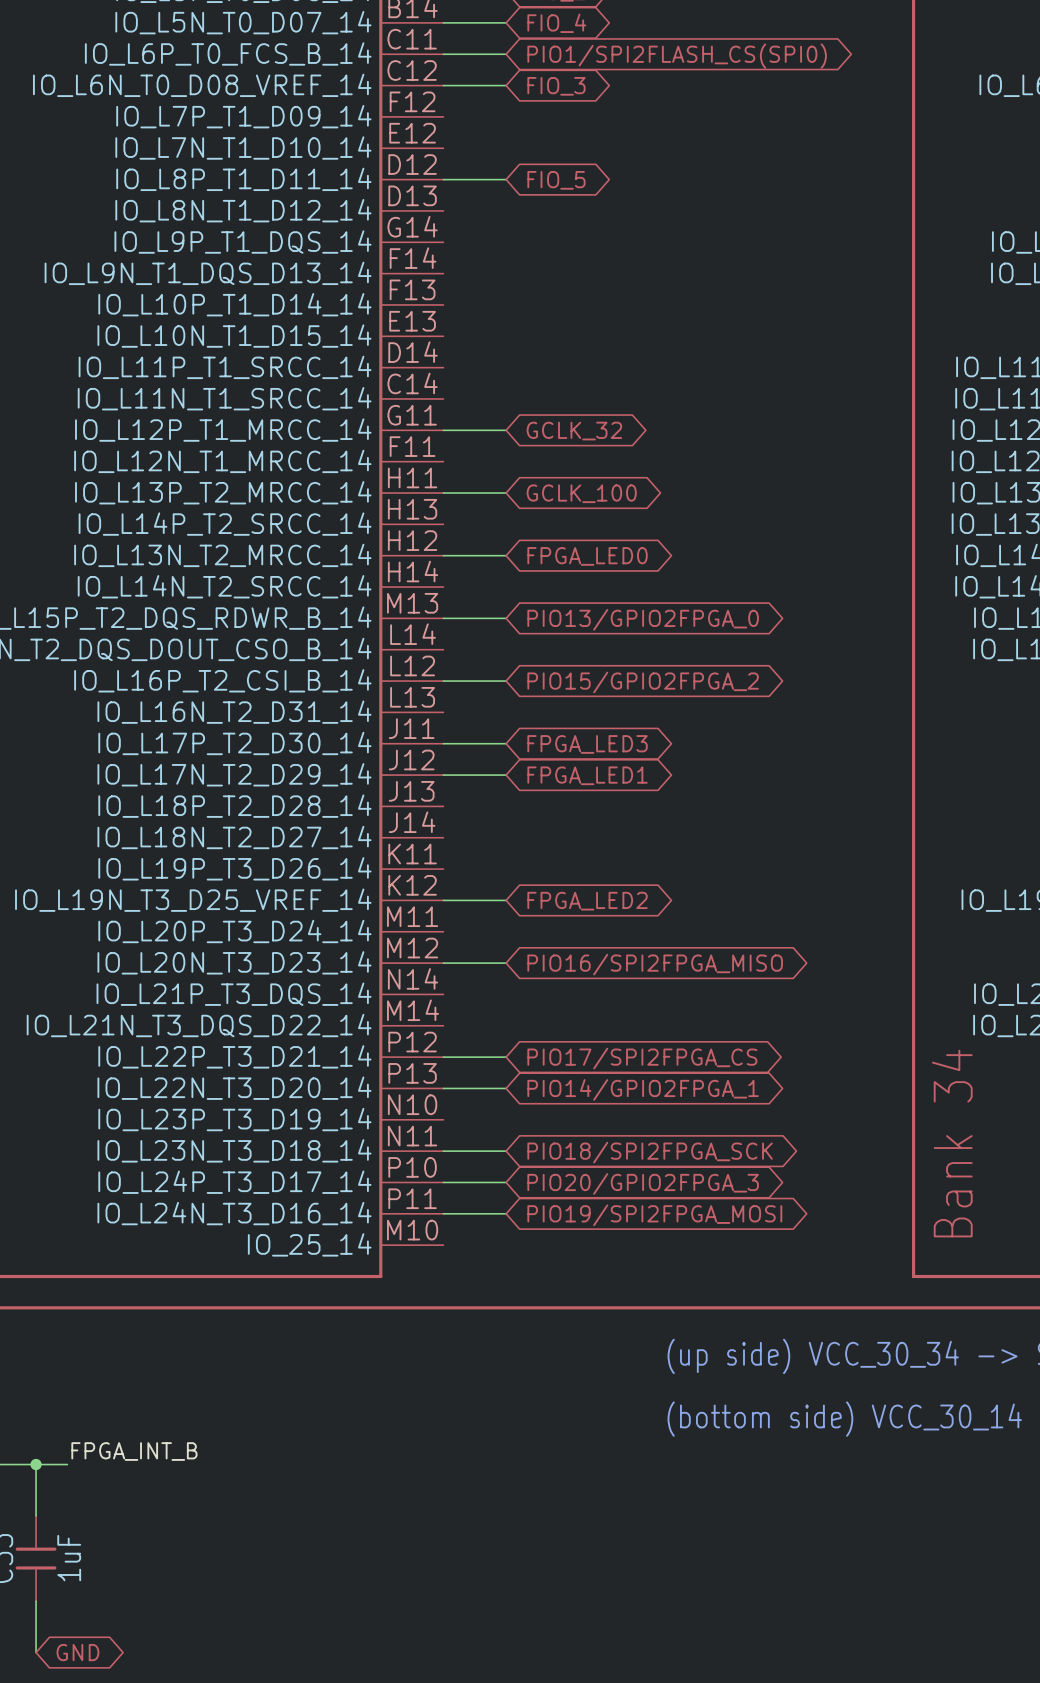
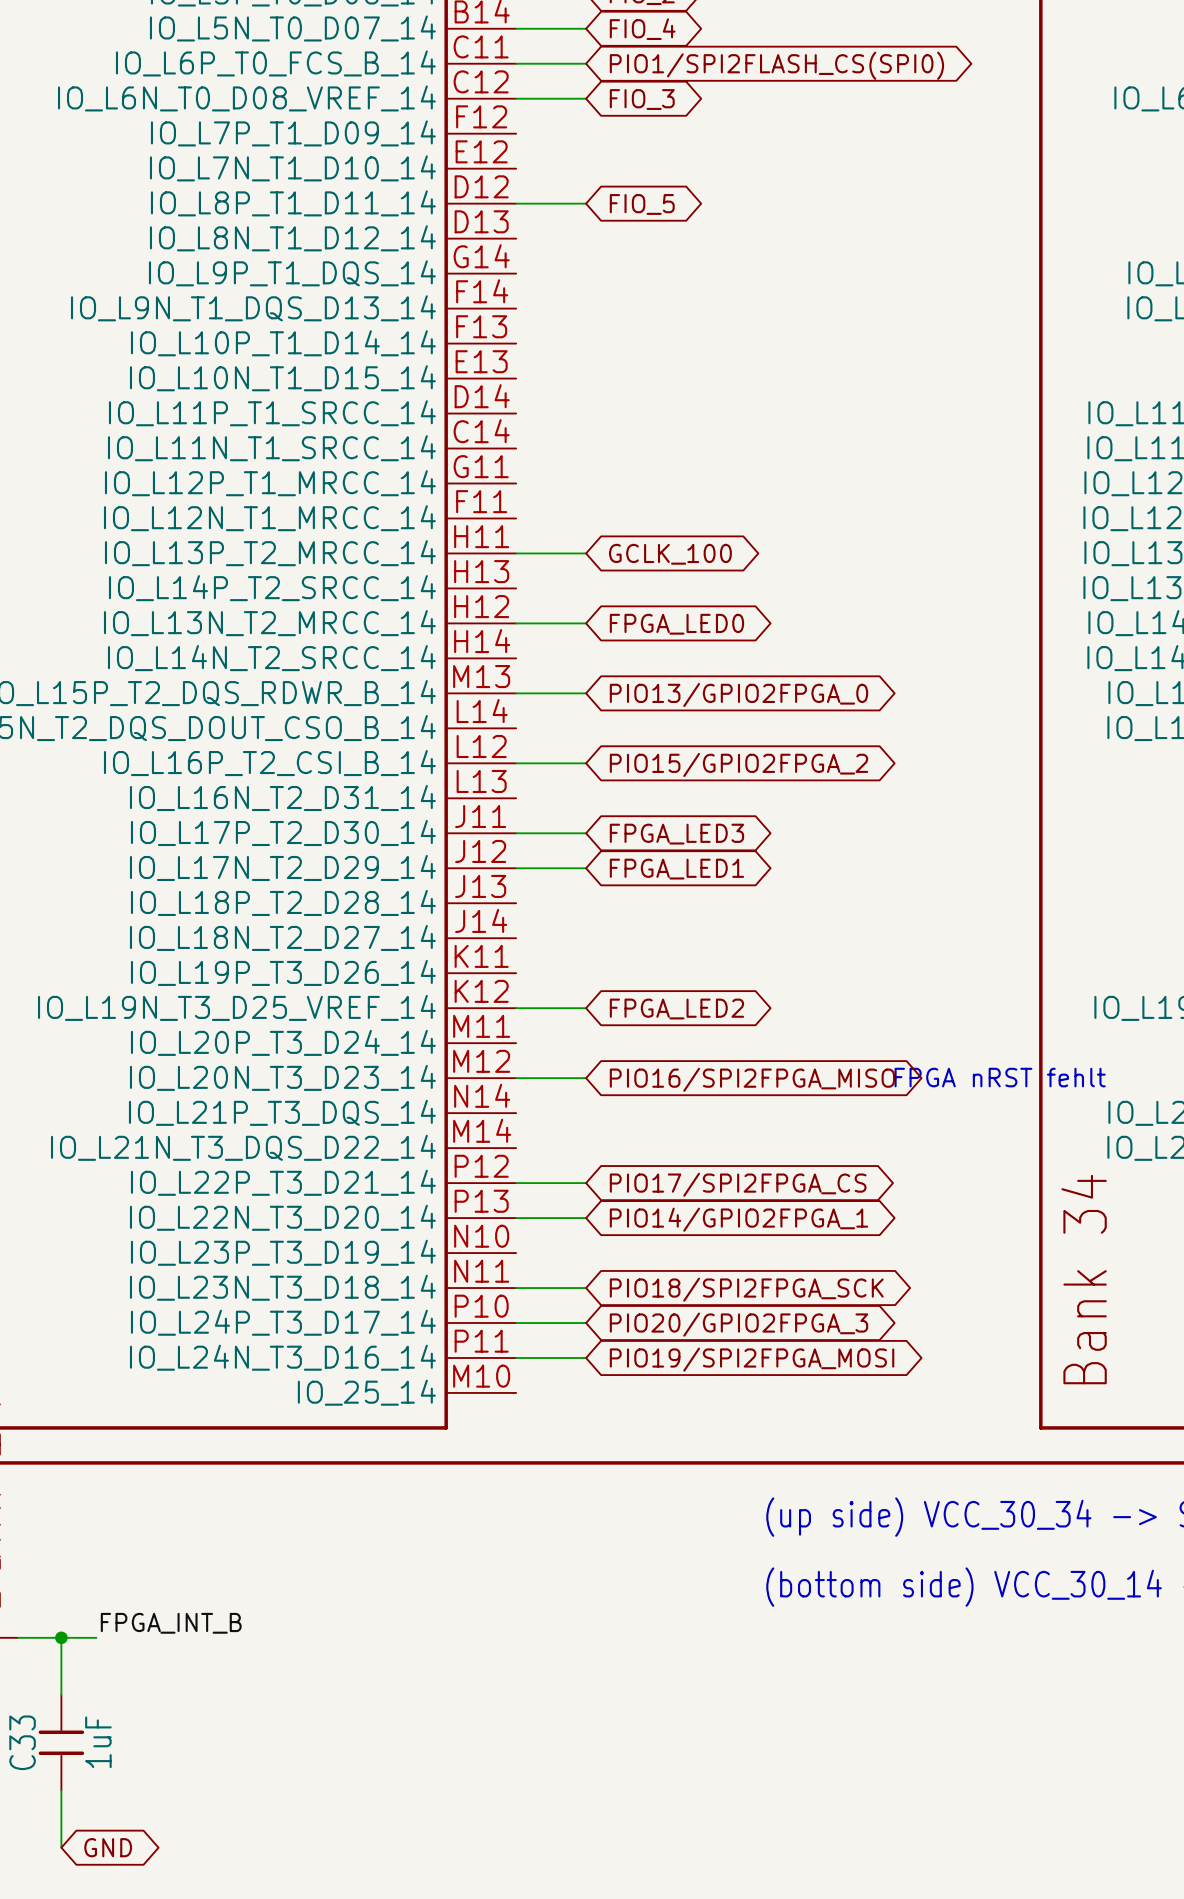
wire: (443, 430) (506, 430) -> none
global label: GCLK_32 (574, 431) -> none
text: none -> FPGA nRST fehlt (1000, 1077)

